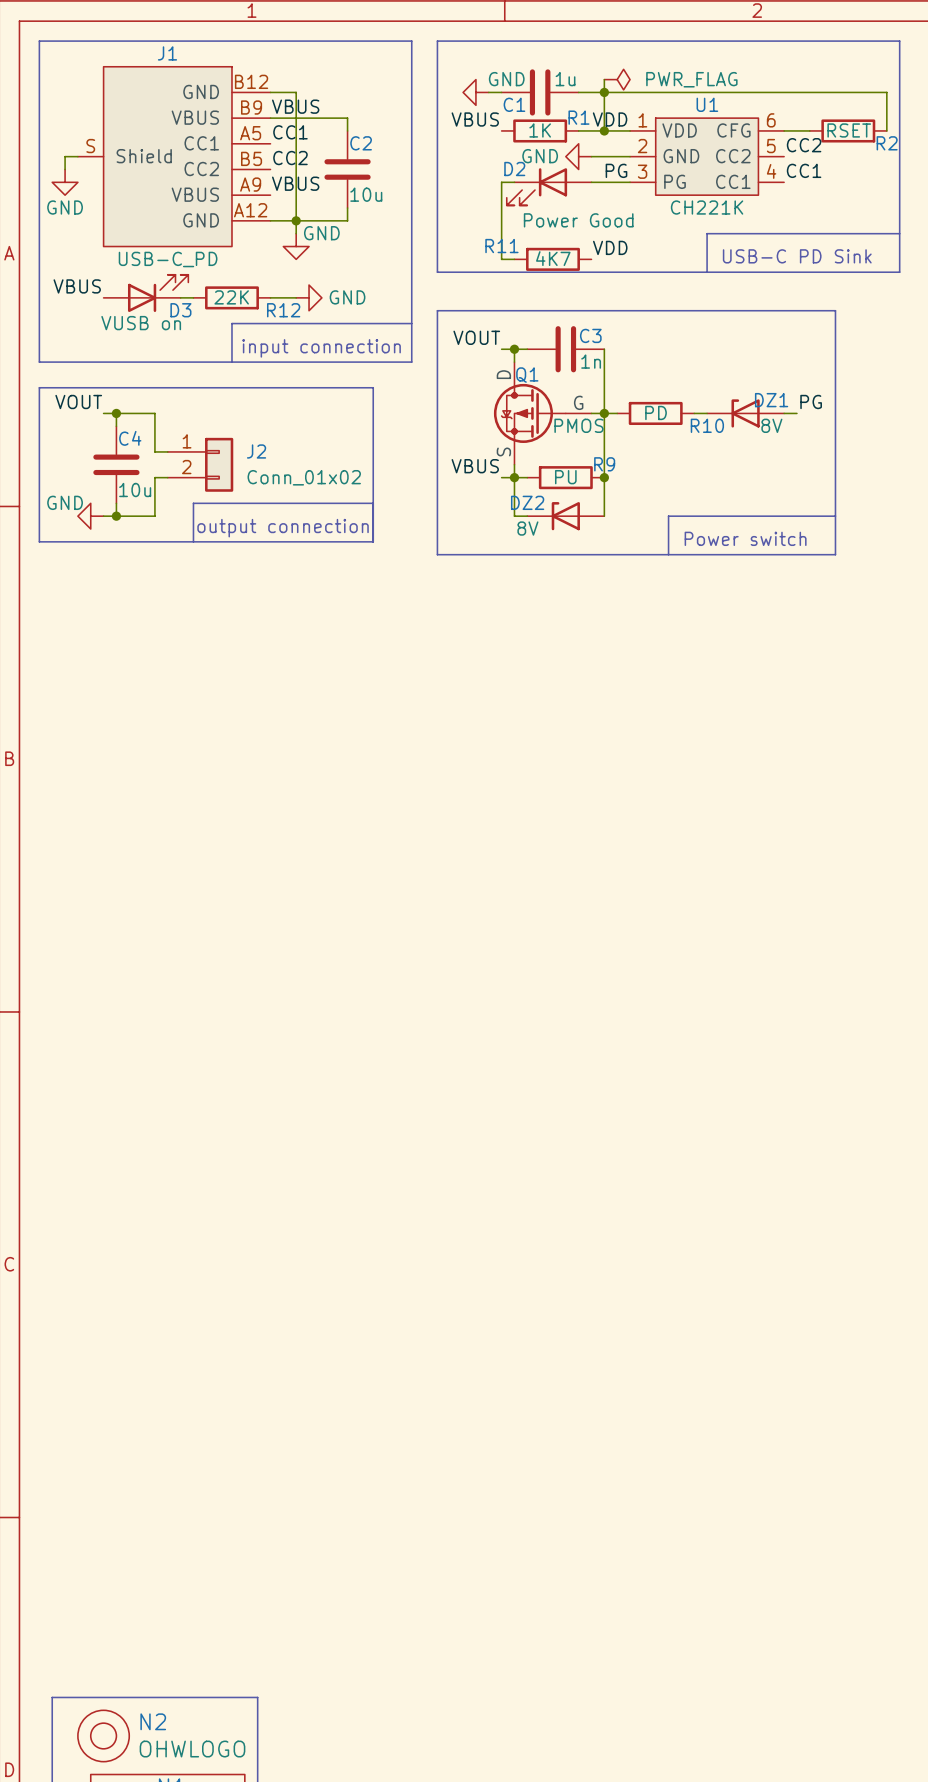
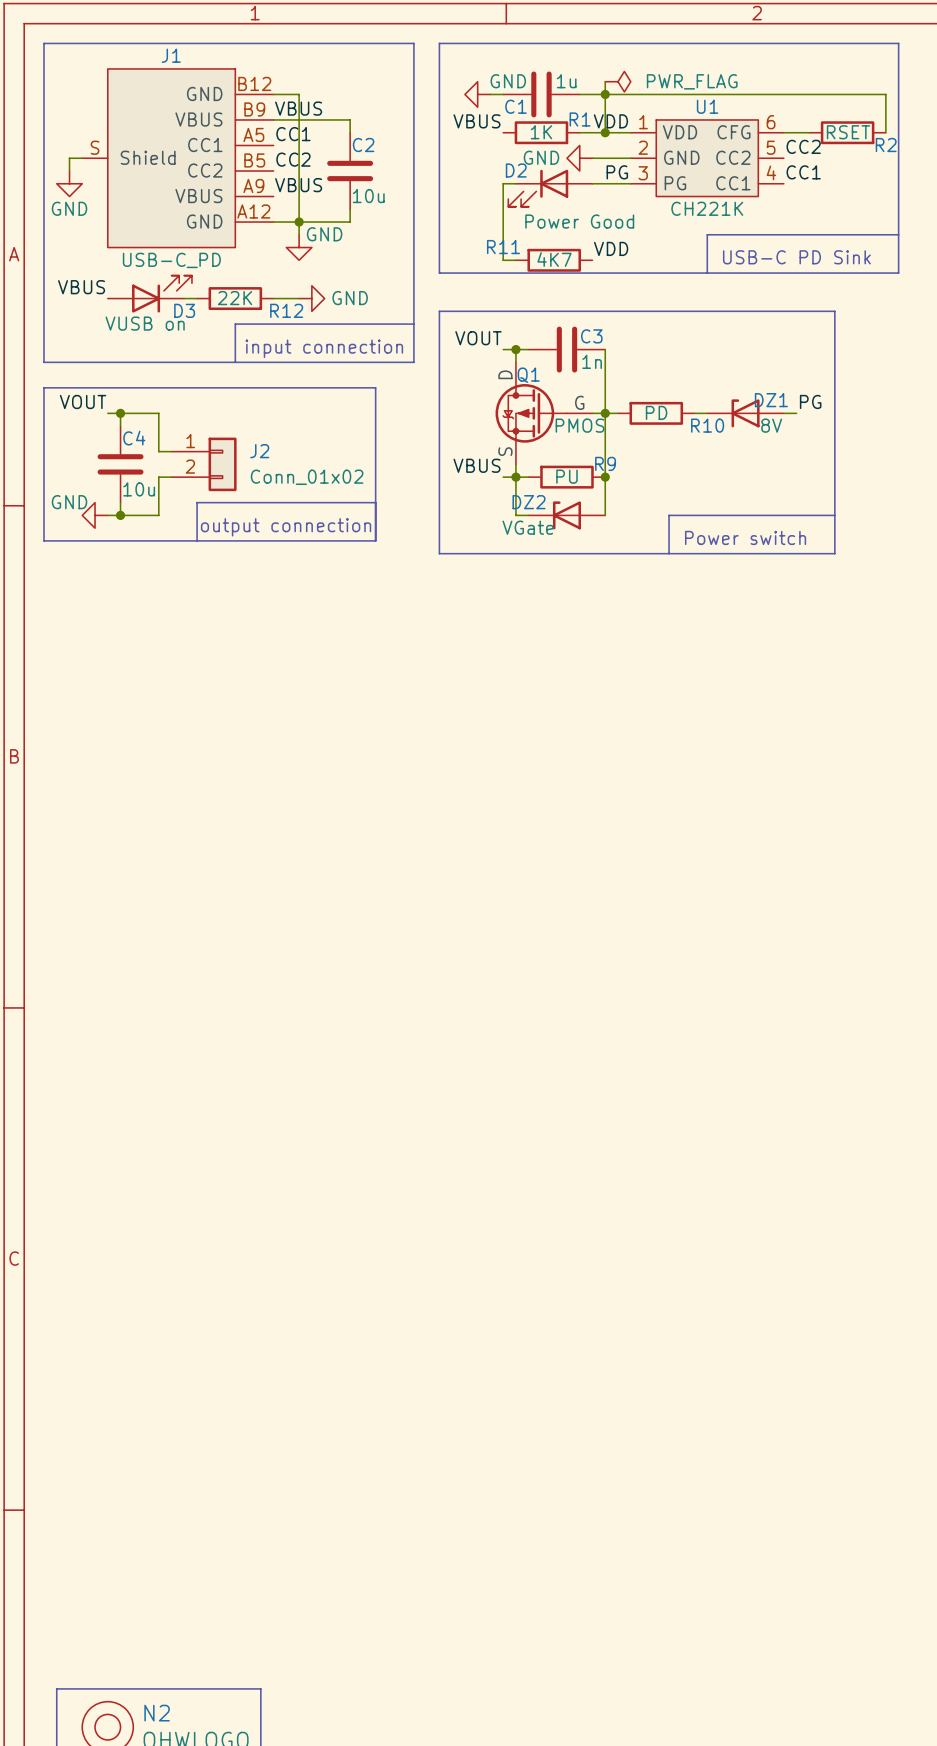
DZ2 value: 8V (527, 528) -> VGate (528, 527)

